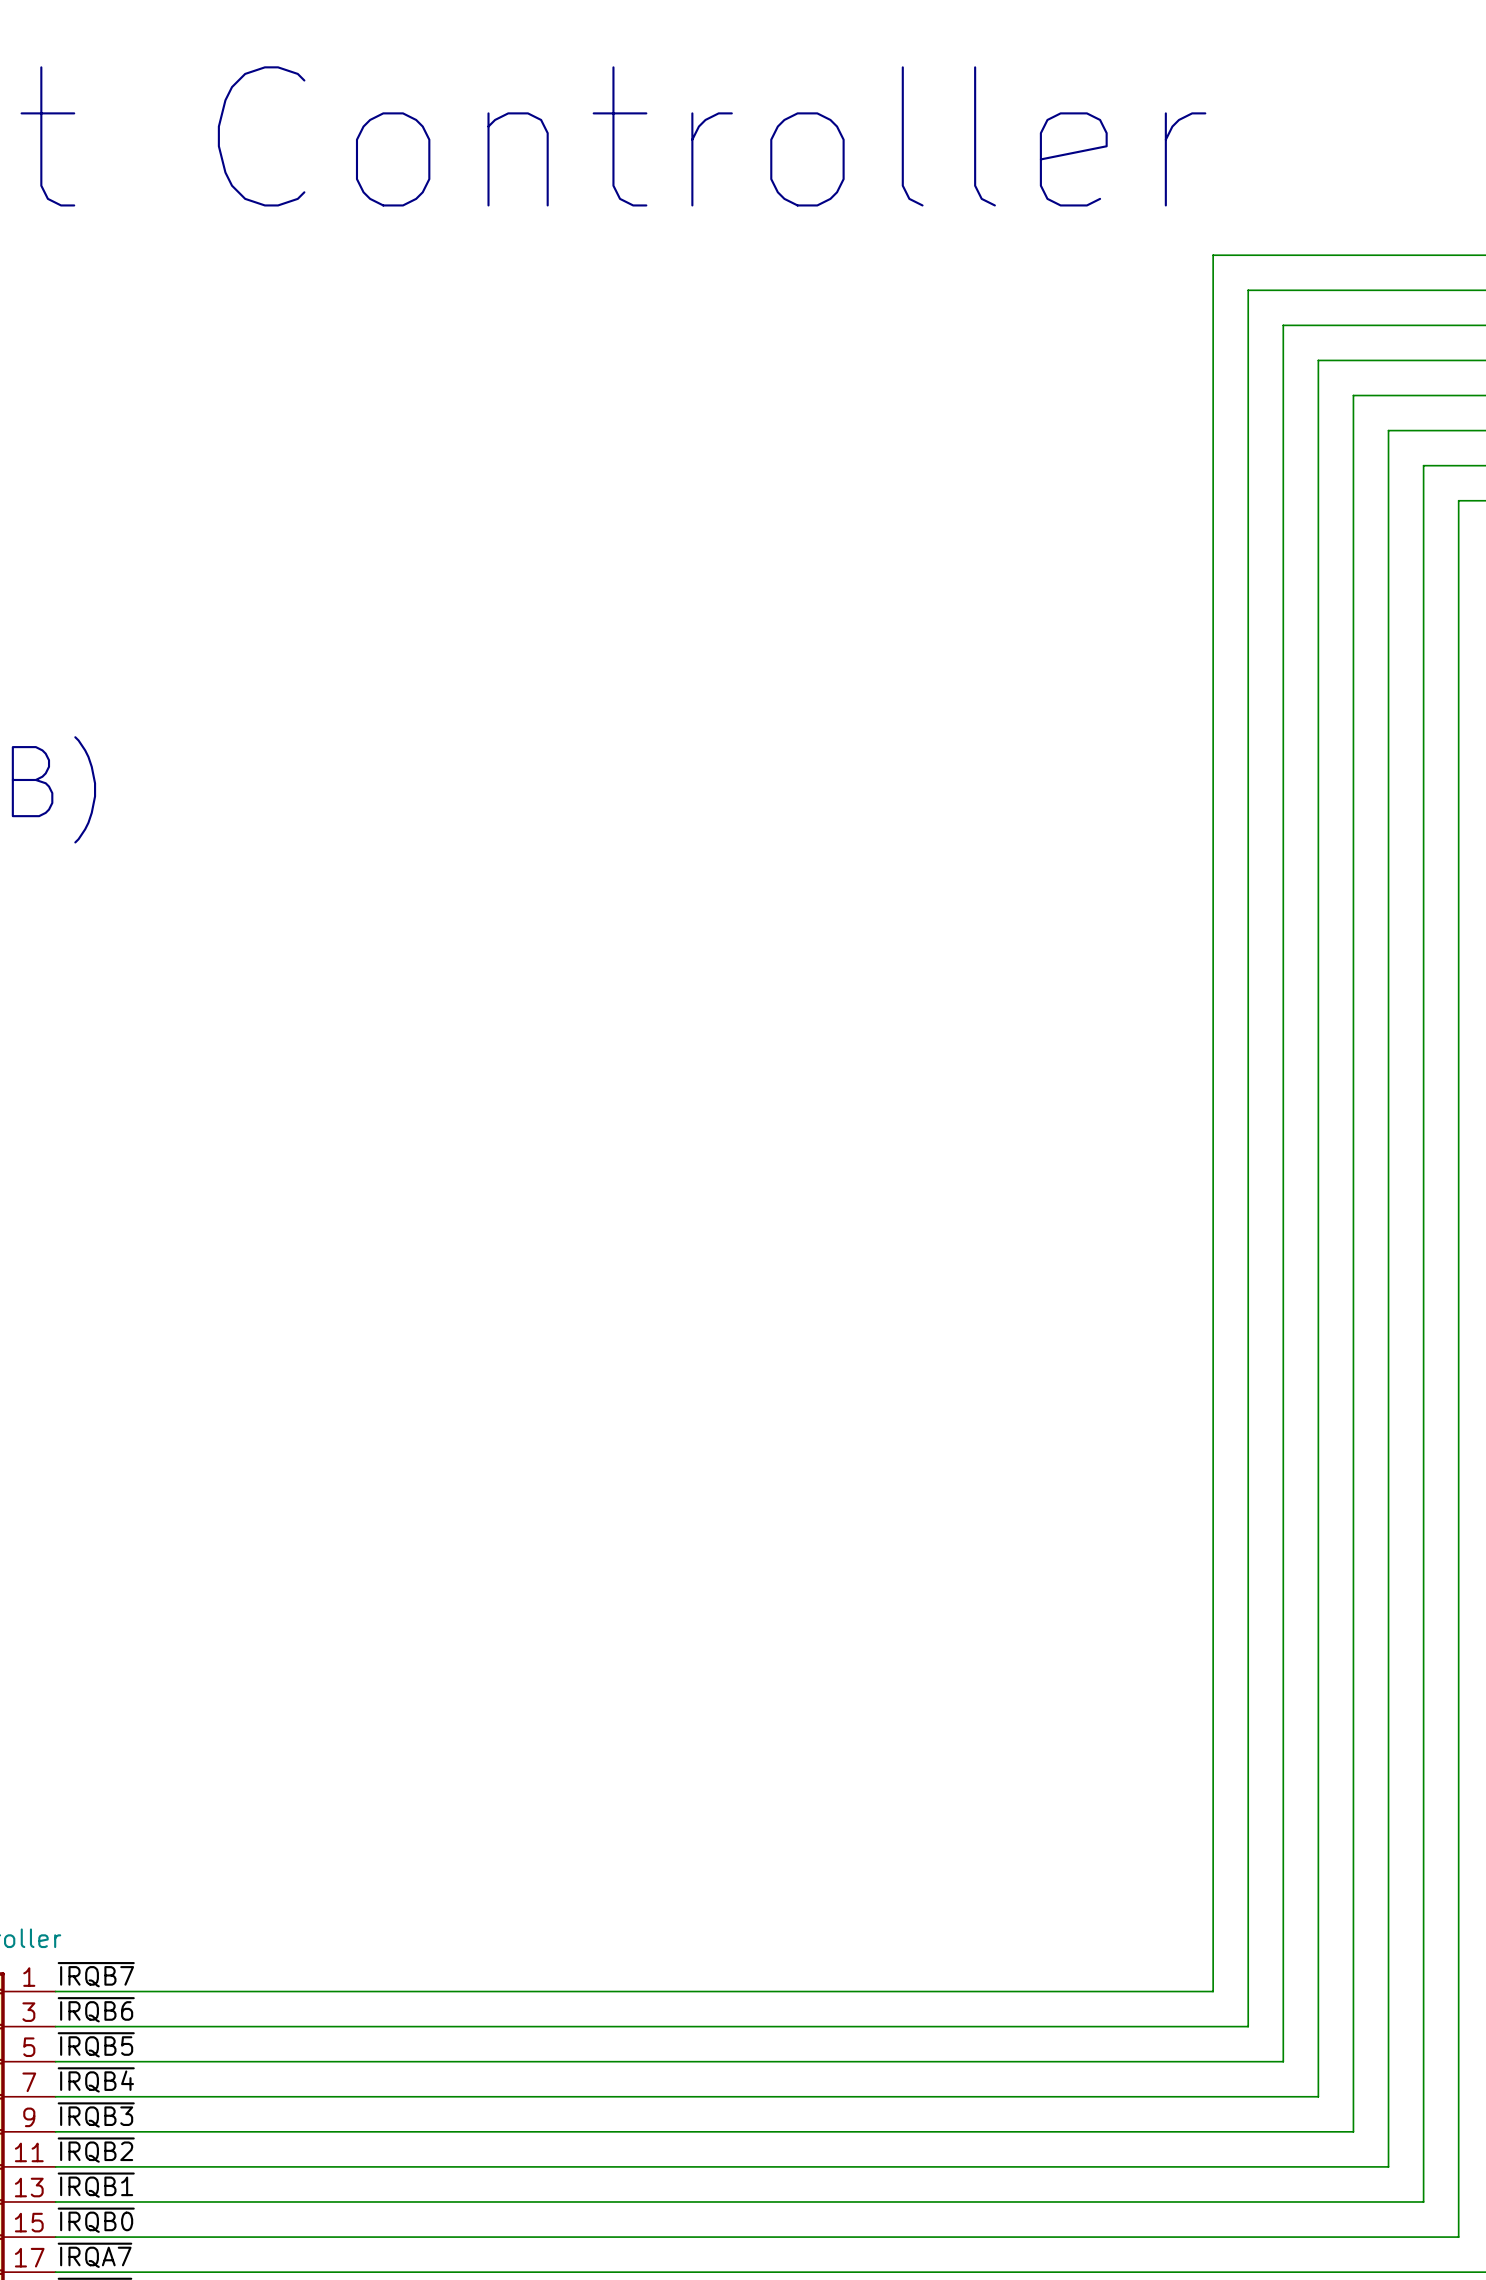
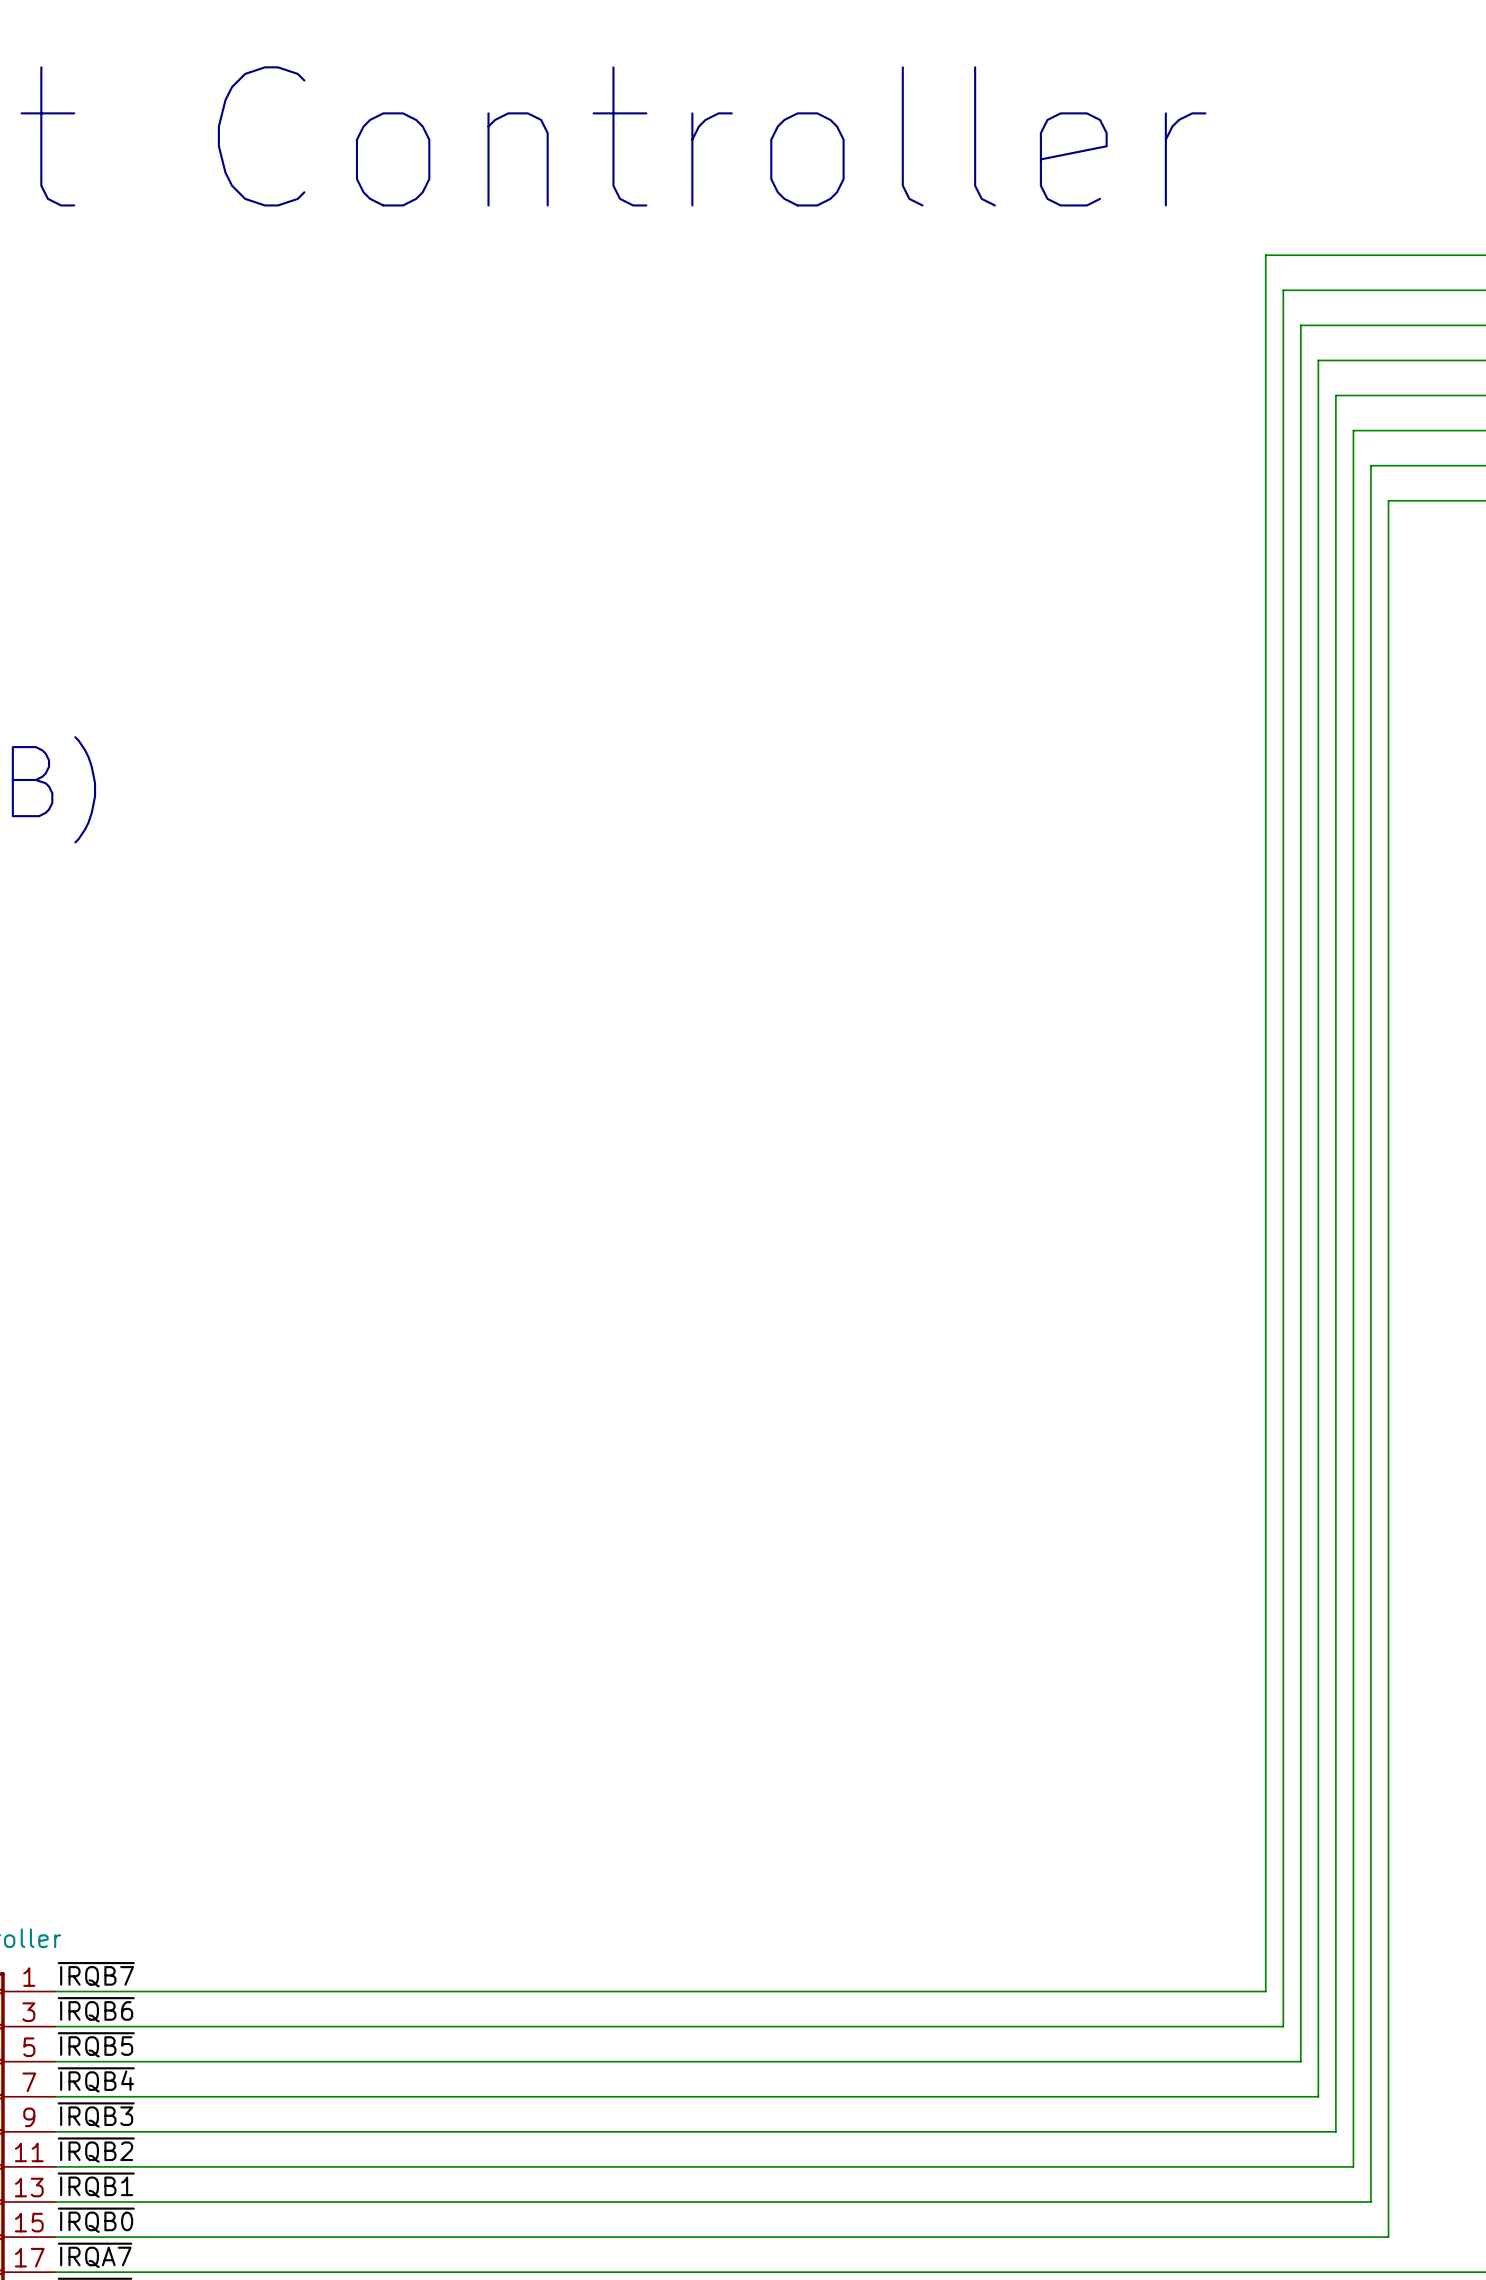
wire: (1265, 255) (1213, 255) (1213, 1991) -> (1265, 255) (1265, 1991) (1213, 1991)
wire: (1283, 290) (1248, 290) (1248, 2026) -> none
wire: (1283, 325) (1300, 325) -> (1283, 325) (1283, 290)
wire: none -> (1300, 325) (1300, 2061) (1283, 2061)
wire: (1353, 395) (1353, 430) -> (1388, 430) (1353, 430)
wire: none -> (1353, 395) (1335, 395) (1335, 2131)
wire: (1388, 430) (1388, 500) -> (1458, 500) (1388, 500)
wire: (1423, 465) (1423, 2201) (1370, 2201) -> (1423, 465) (1370, 465) (1370, 2201)
wire: (1458, 500) (1458, 2237) (1388, 2237) -> none
wire: (1283, 2026) (1283, 2061) -> (1283, 2026) (1248, 2026)
wire: (1335, 2131) (1353, 2131) -> (1353, 2166) (1353, 2131)
wire: (1353, 2166) (1388, 2166) -> (1388, 2237) (1388, 2166)

